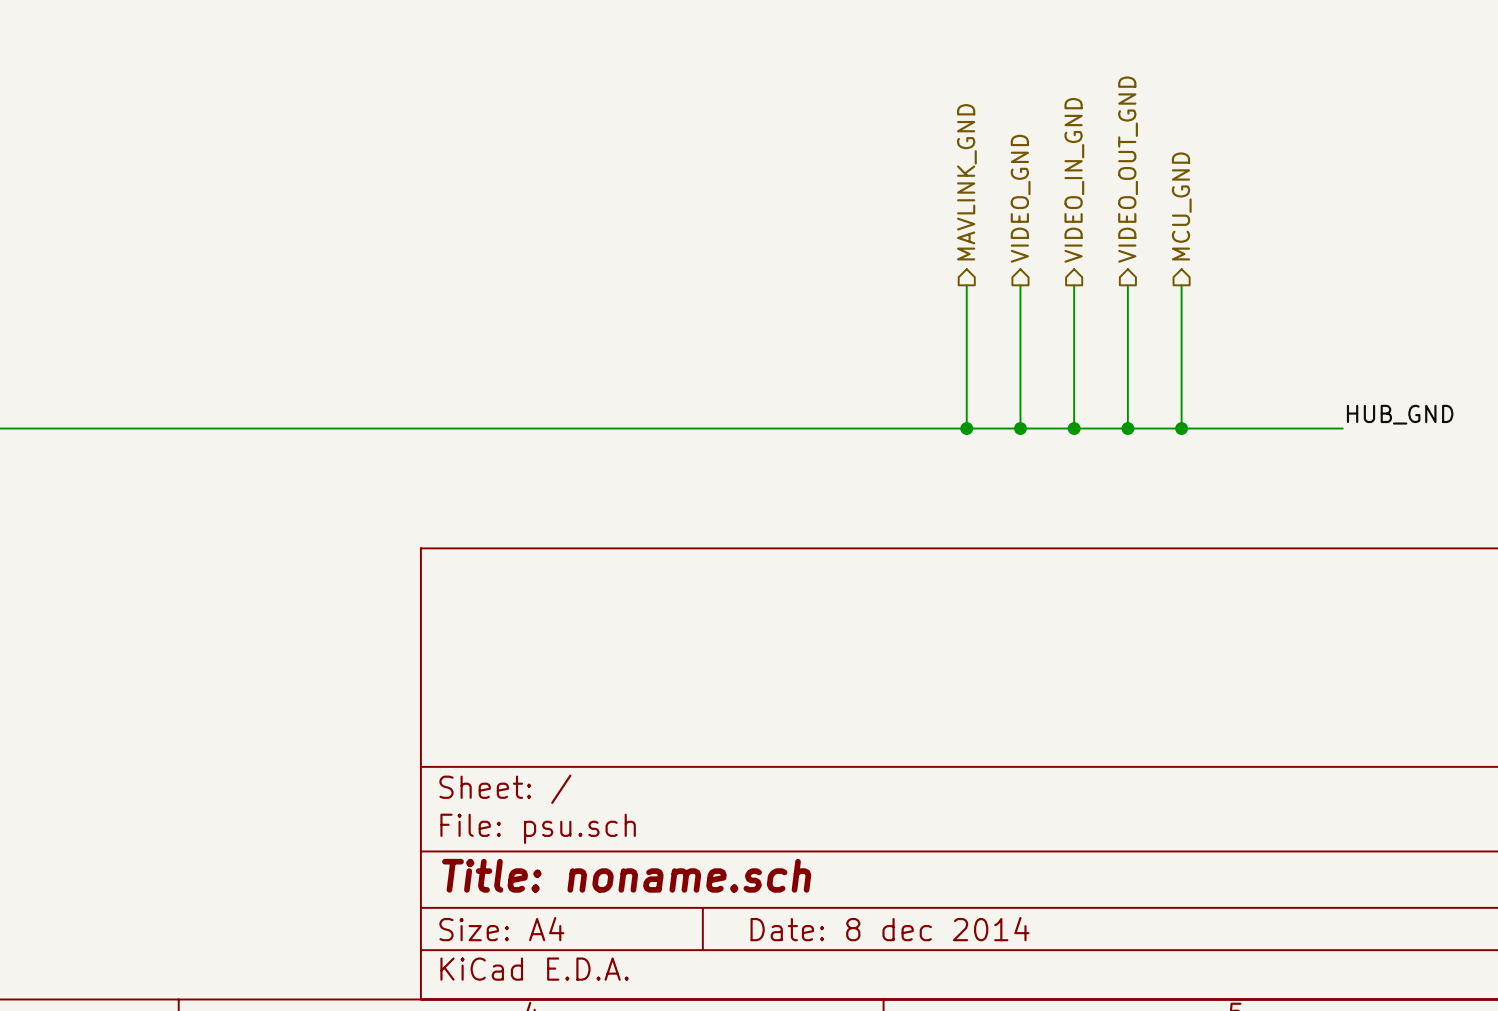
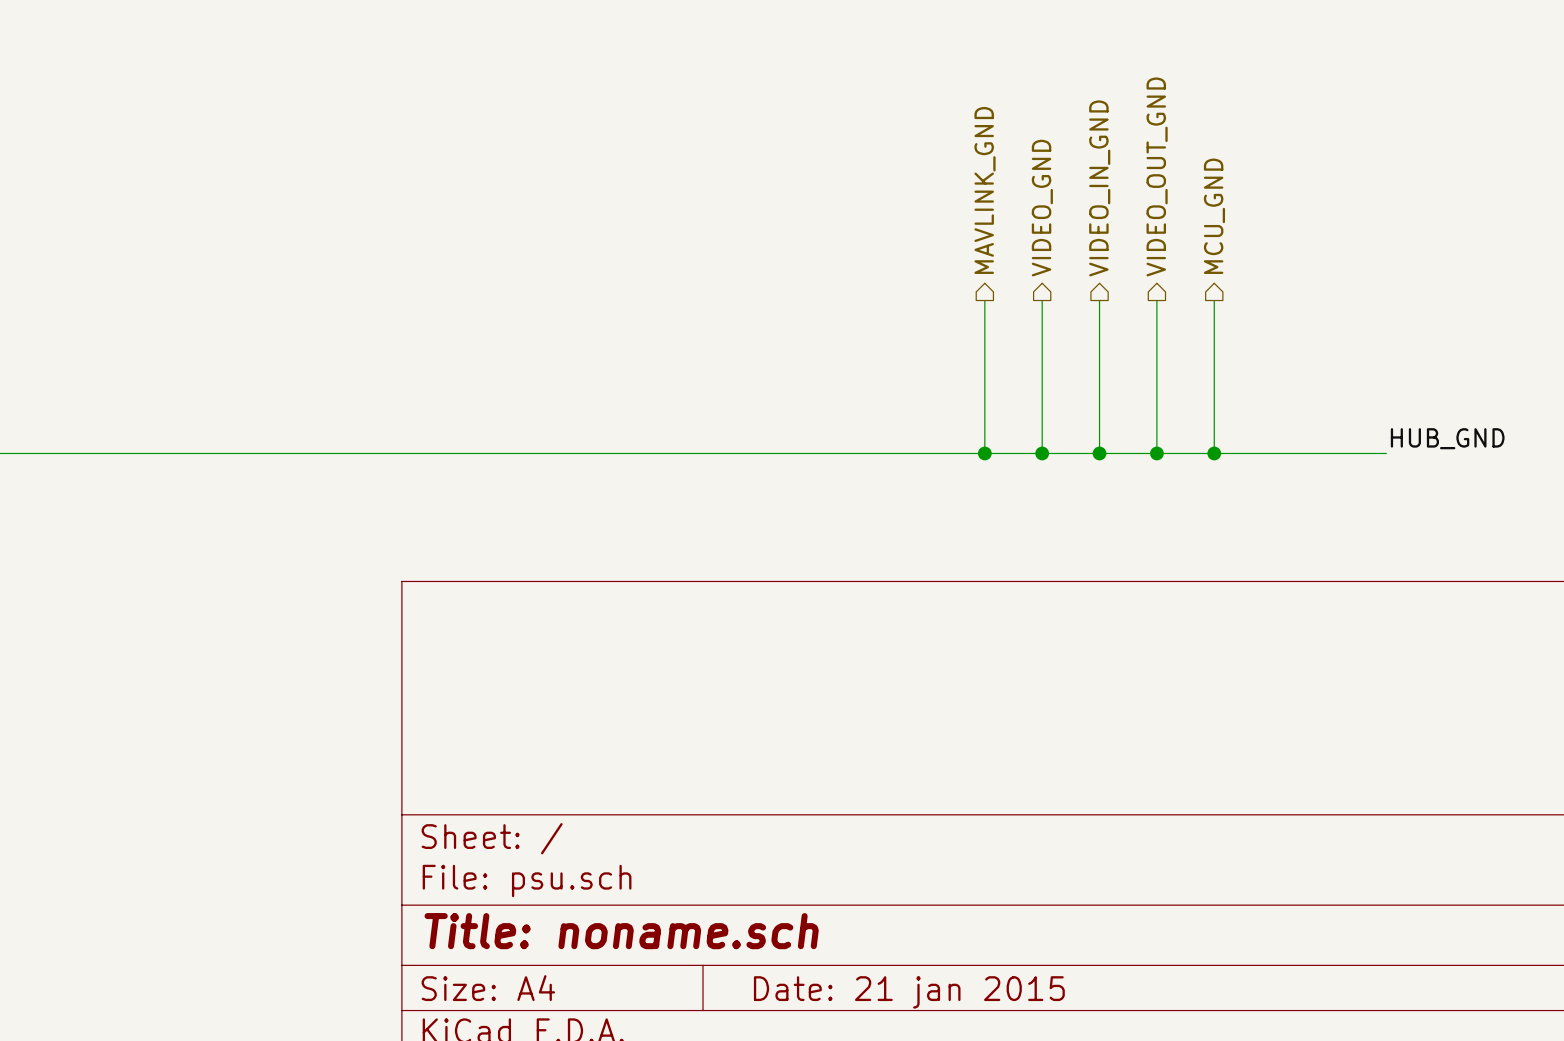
title block: Date: 8 dec 2014 (890, 929) -> Date: 21 jan 2015 (909, 992)

